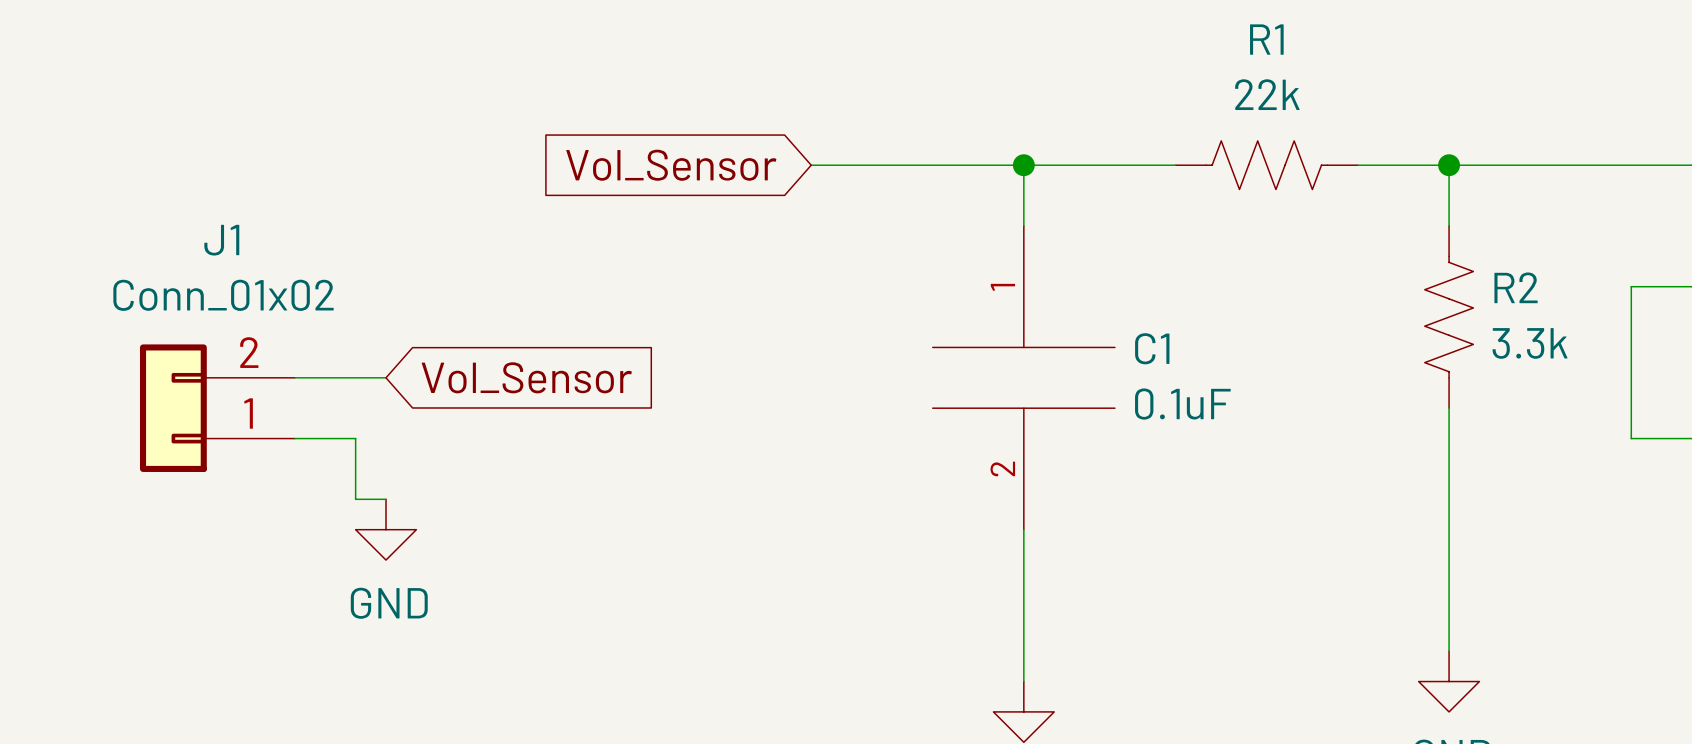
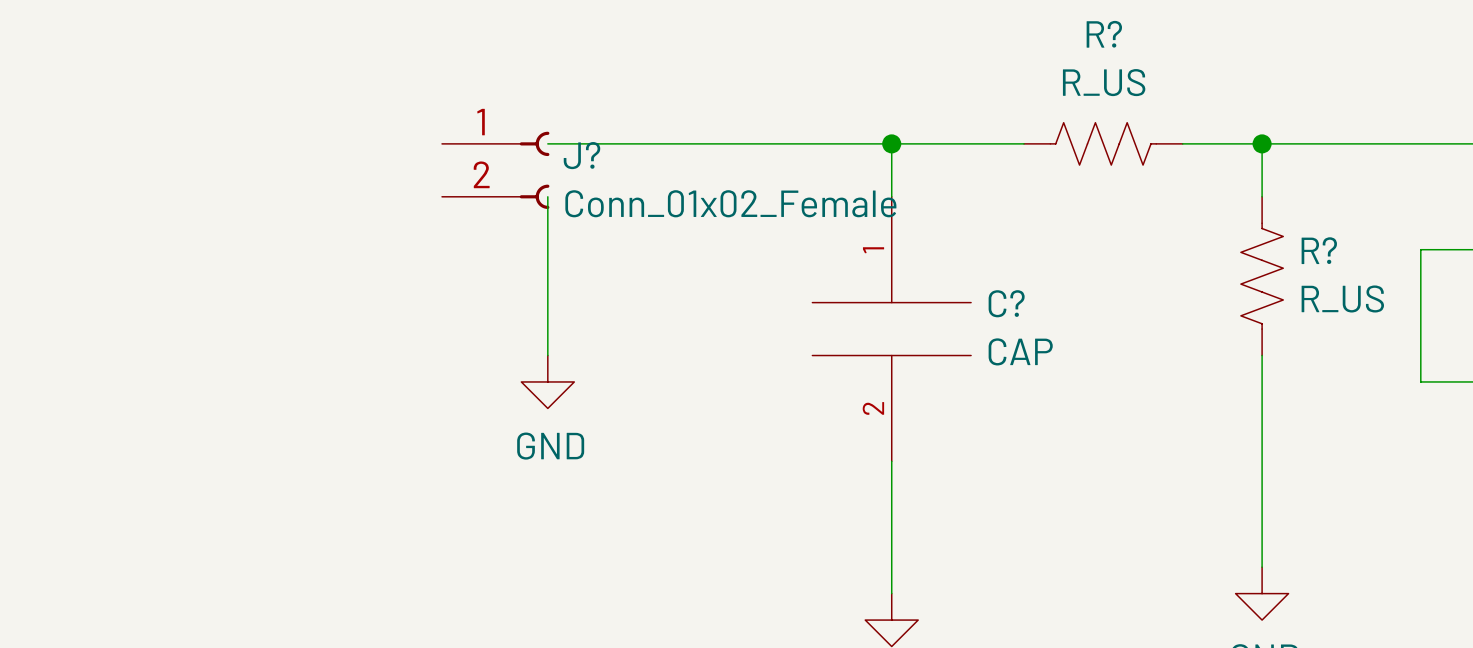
R1 name: R1 (1266, 39) -> R? (1104, 34)
R1 value: 22k (1267, 94) -> R_US (1104, 82)
wire: none -> (547, 143) (706, 143)
global label: Vol_Sensor (671, 165) -> none
J?: none -> Conn_01x02_Female (495, 170)
wire: none -> (547, 196) (547, 355)
R2 name: R2 (1516, 287) -> R? (1319, 250)
R2 value: 3.3k (1530, 343) -> R_US (1342, 298)
C1 name: C1 (1152, 348) -> C? (1006, 303)
wire: (294, 377) (386, 377) -> none
global label: Vol_Sensor (526, 377) -> none
C1 value: 0.1uF (1182, 404) -> CAP (1020, 351)
J1: Conn_01x02 (217, 408) -> none
wire: (294, 438) (355, 438) (355, 499) (386, 499) -> none
power symbol position: GND (386, 529) -> GND (547, 381)

